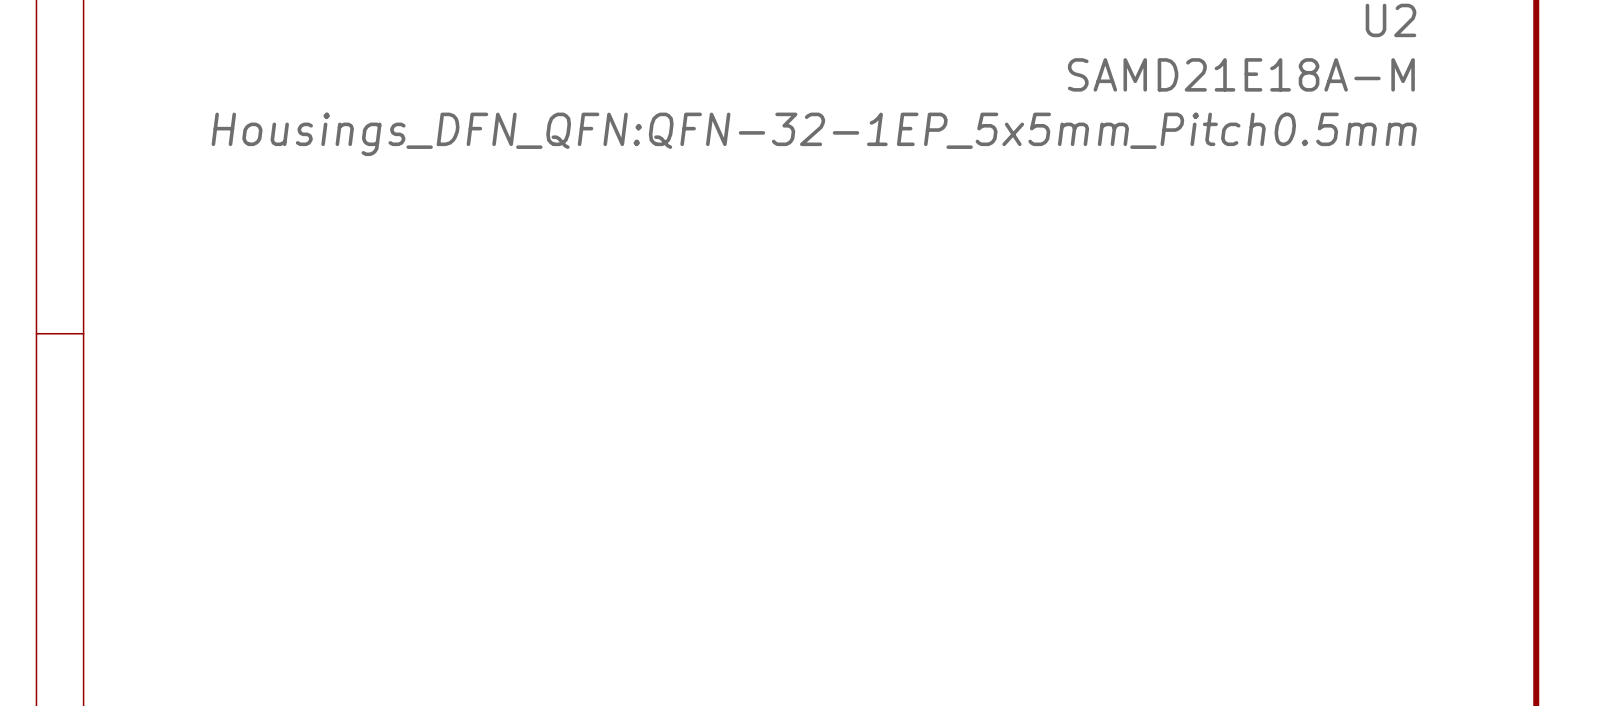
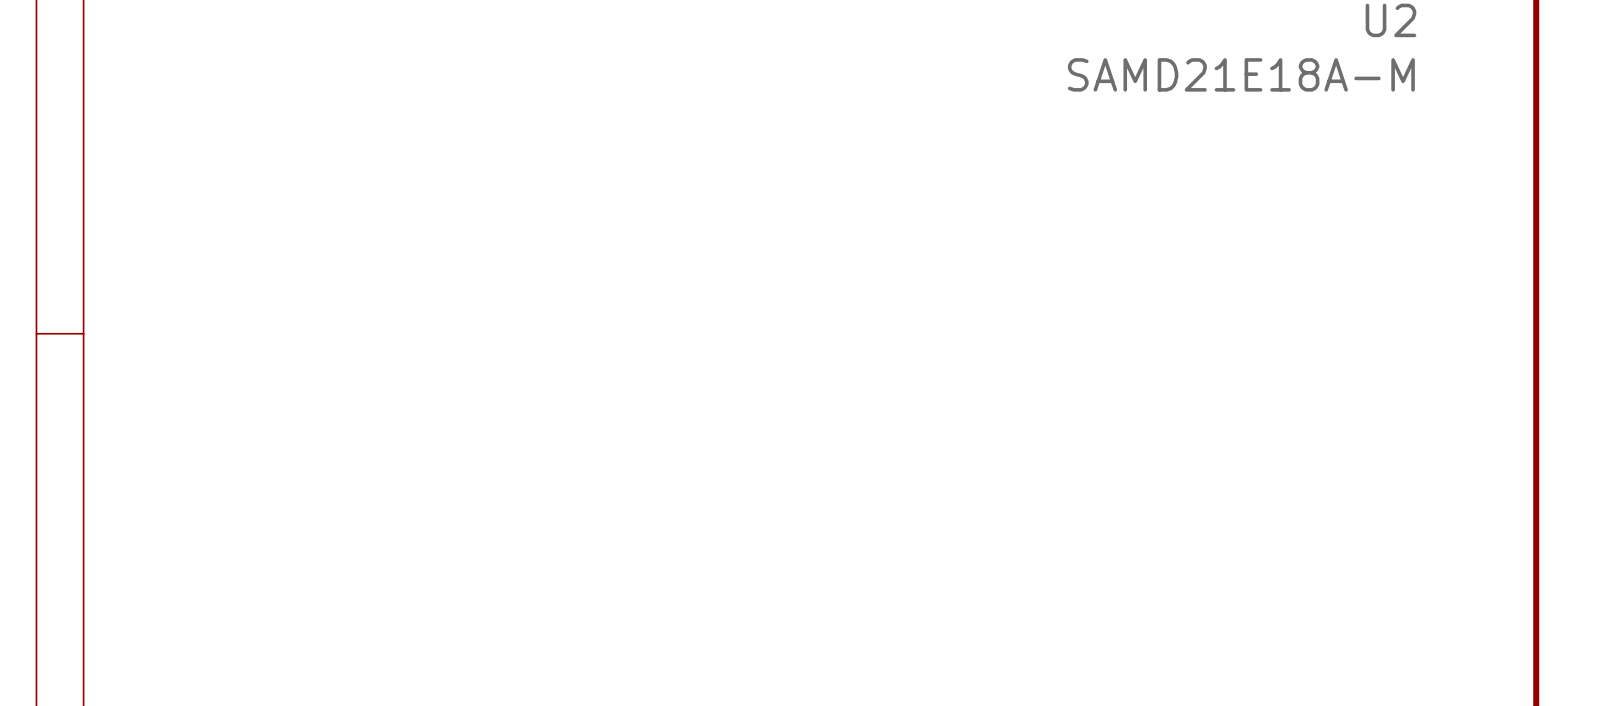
U2 text: Housings_DFN_QFN:QFN-32-1EP_5x5mm_Pitch0.5mm (814, 134) -> none

